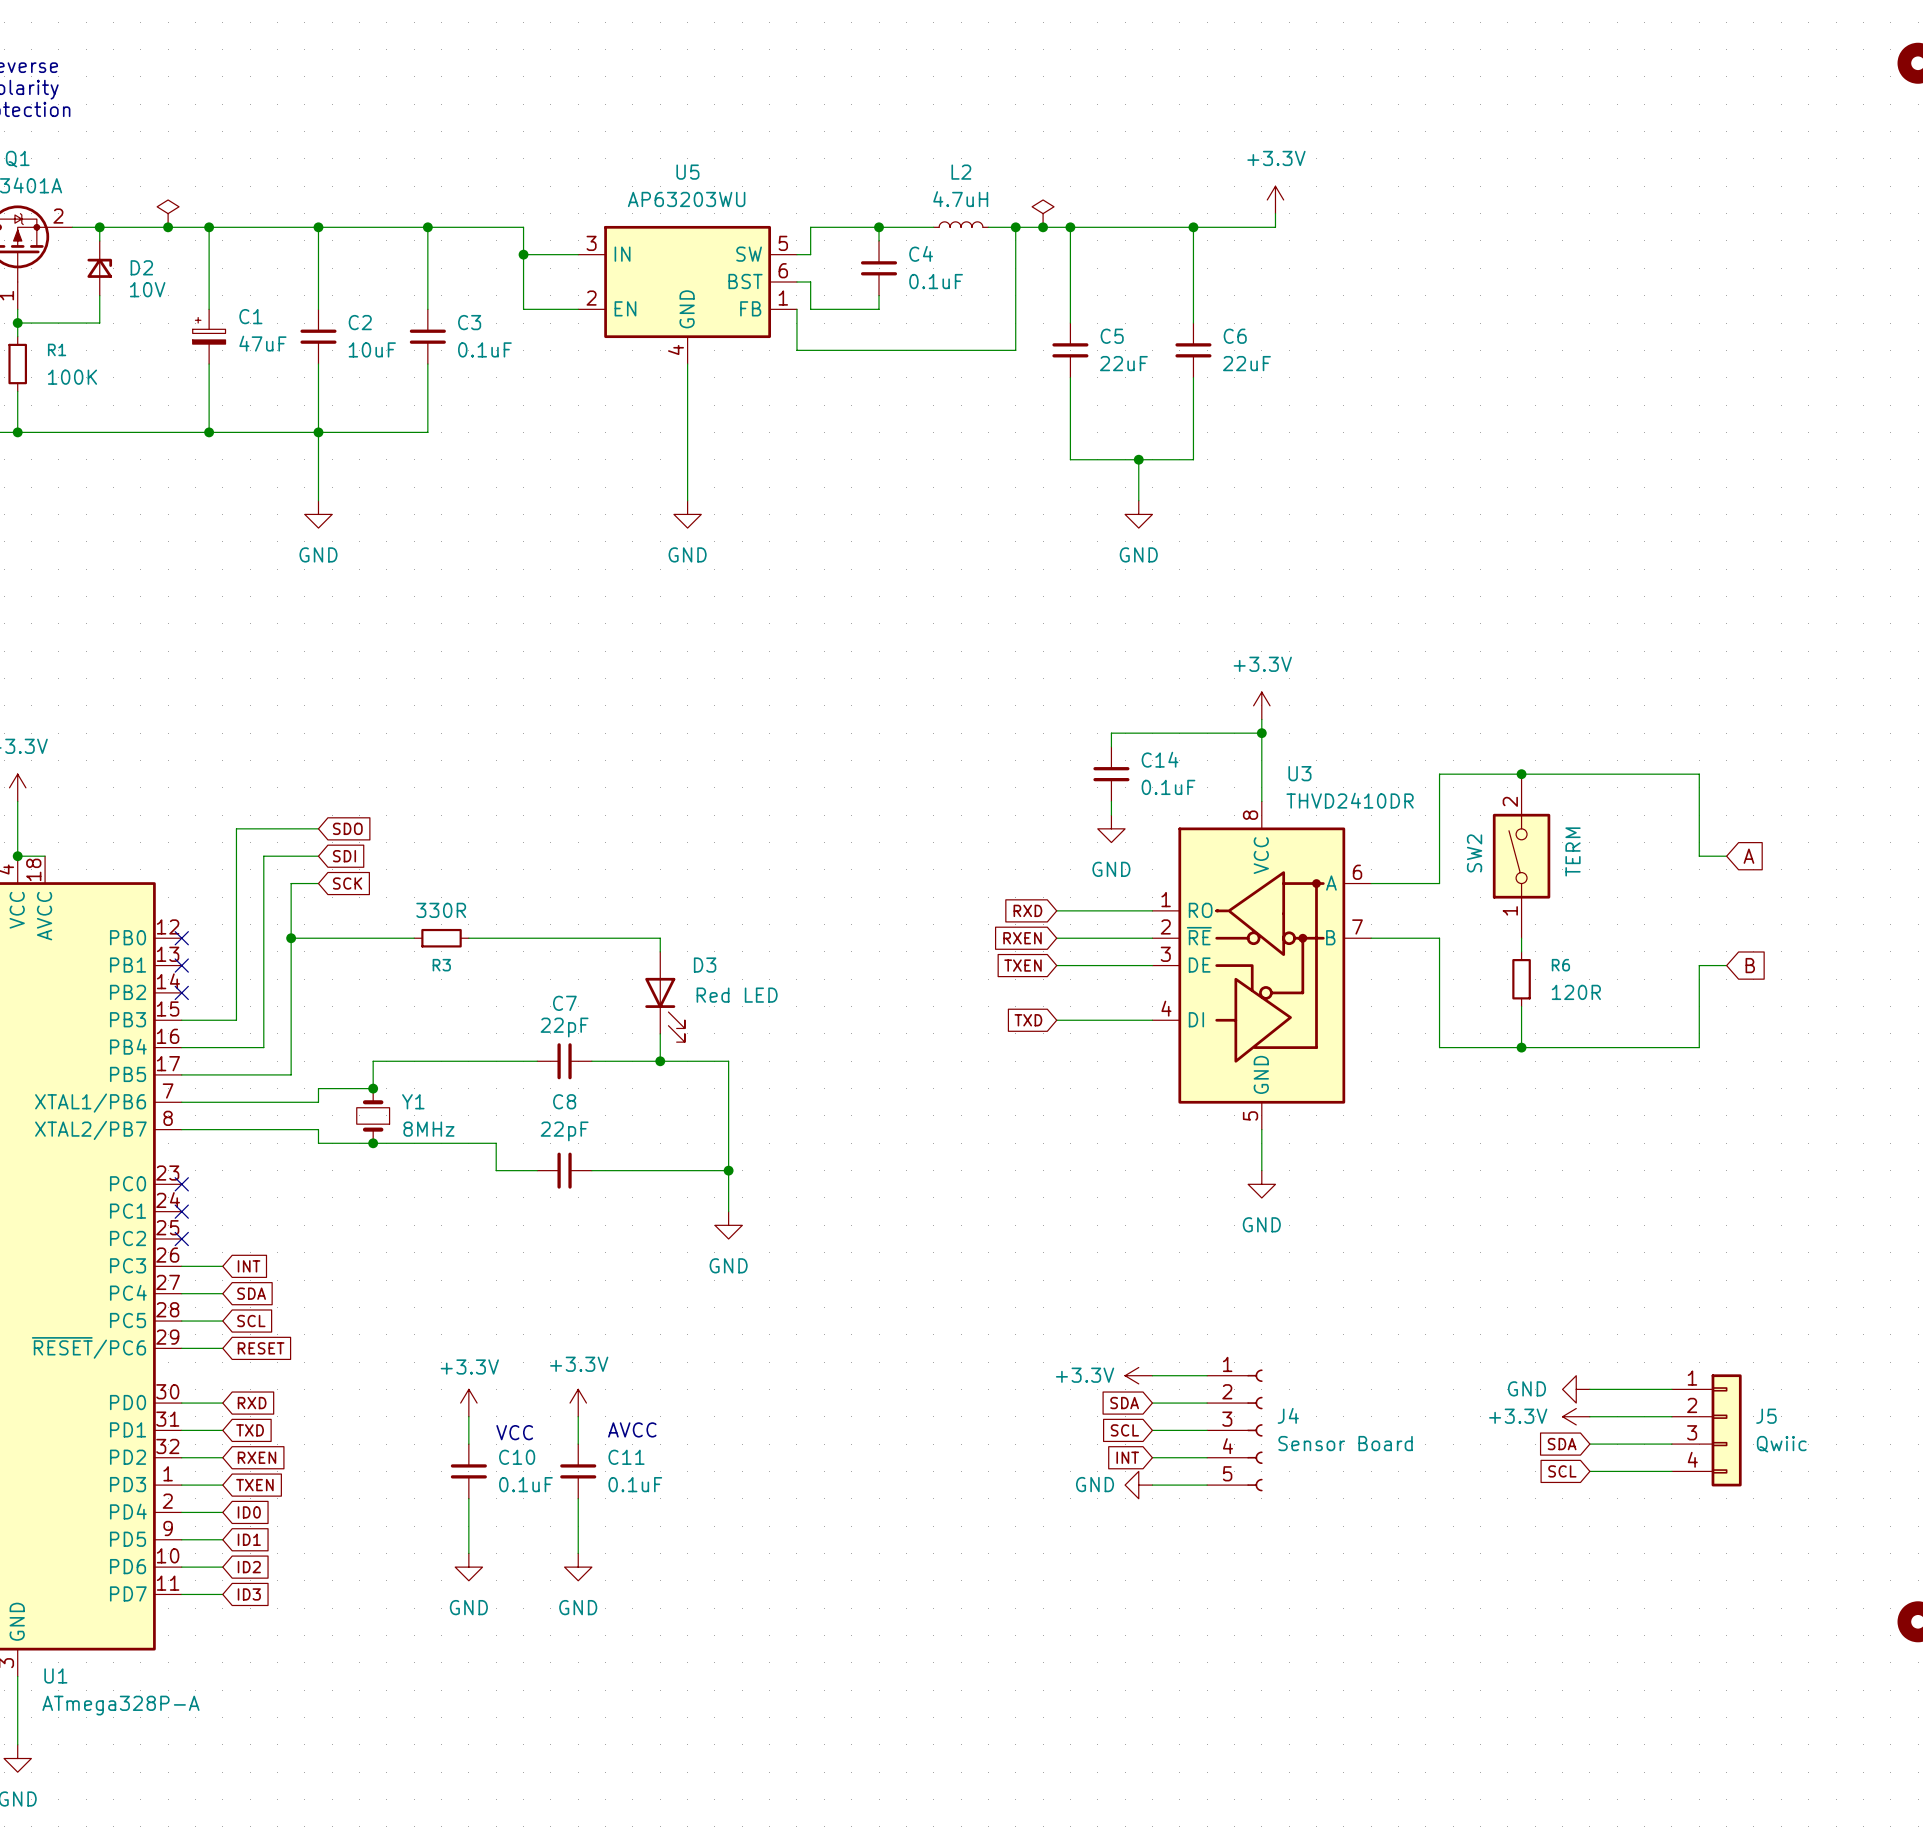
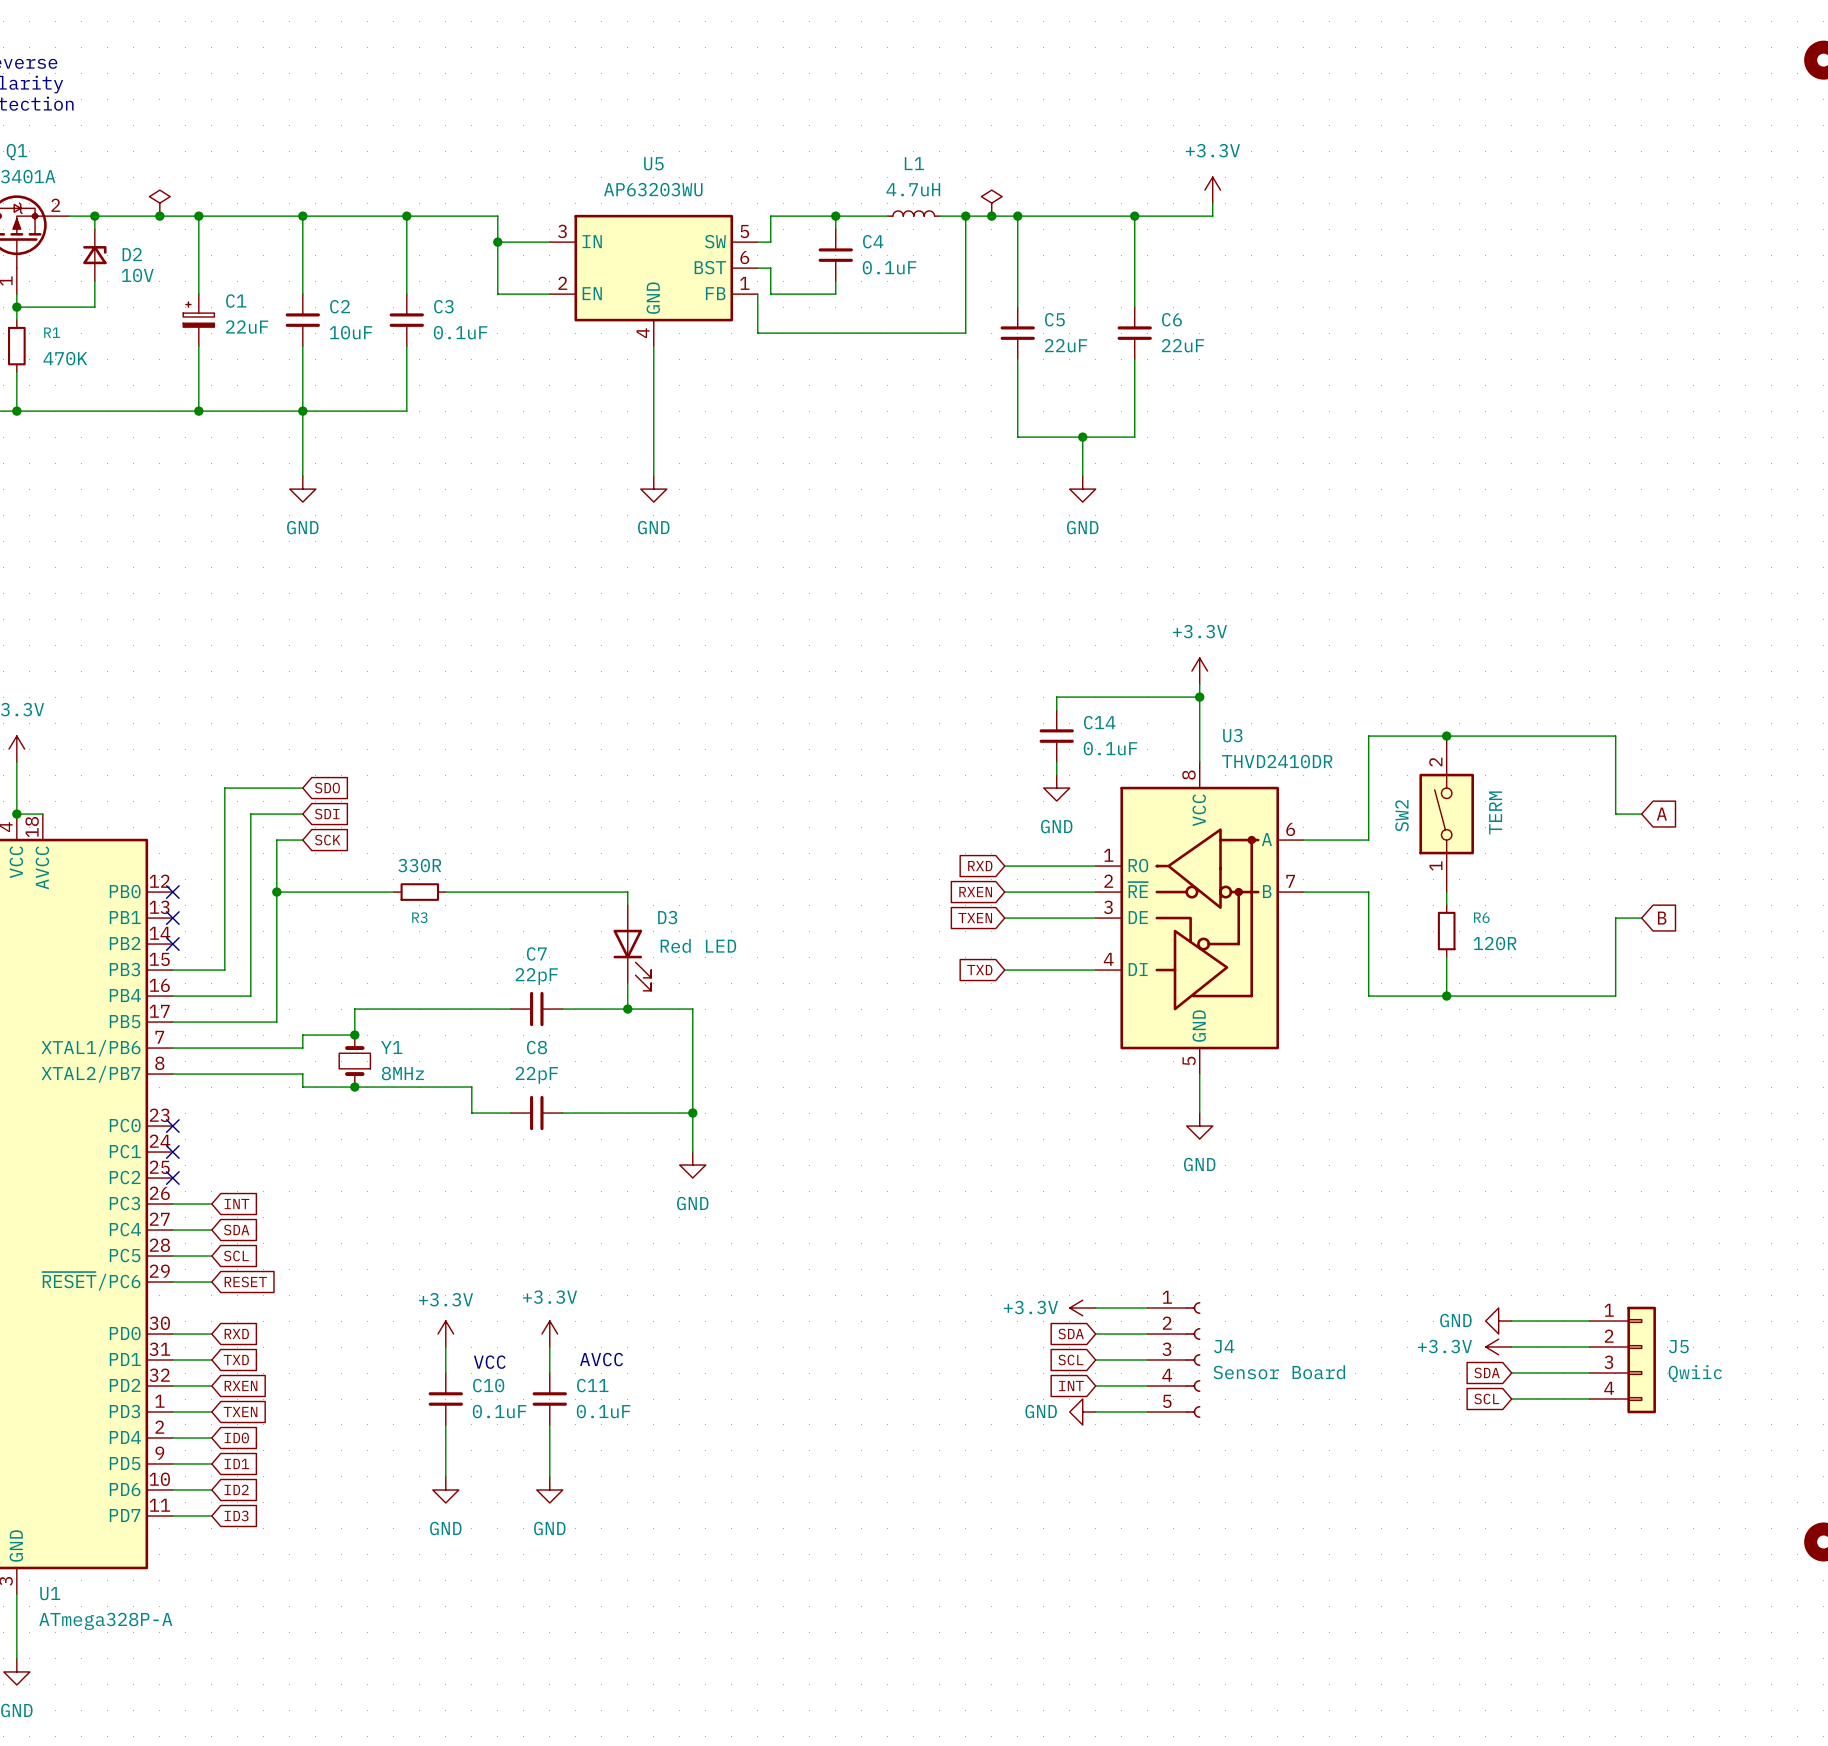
L2 name: L2 (961, 172) -> L1 (914, 163)
C1 value: 47uF (262, 343) -> 22uF (247, 327)
R1 value: 100K (72, 377) -> 470K (65, 358)

